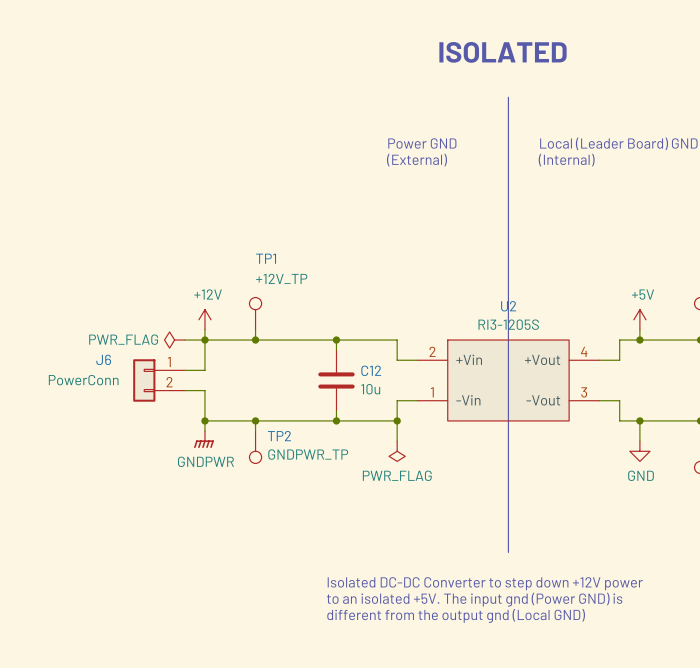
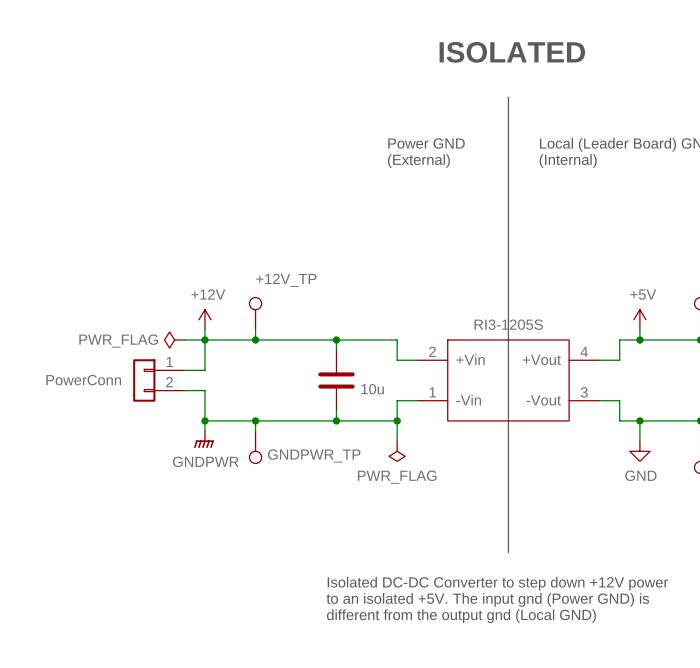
TP1 name: TP1 (266, 258) -> none
U2 name: U2 (508, 306) -> none
J6 name: J6 (103, 359) -> none
C12 name: C12 (371, 370) -> none
TP2 name: TP2 (279, 436) -> none

